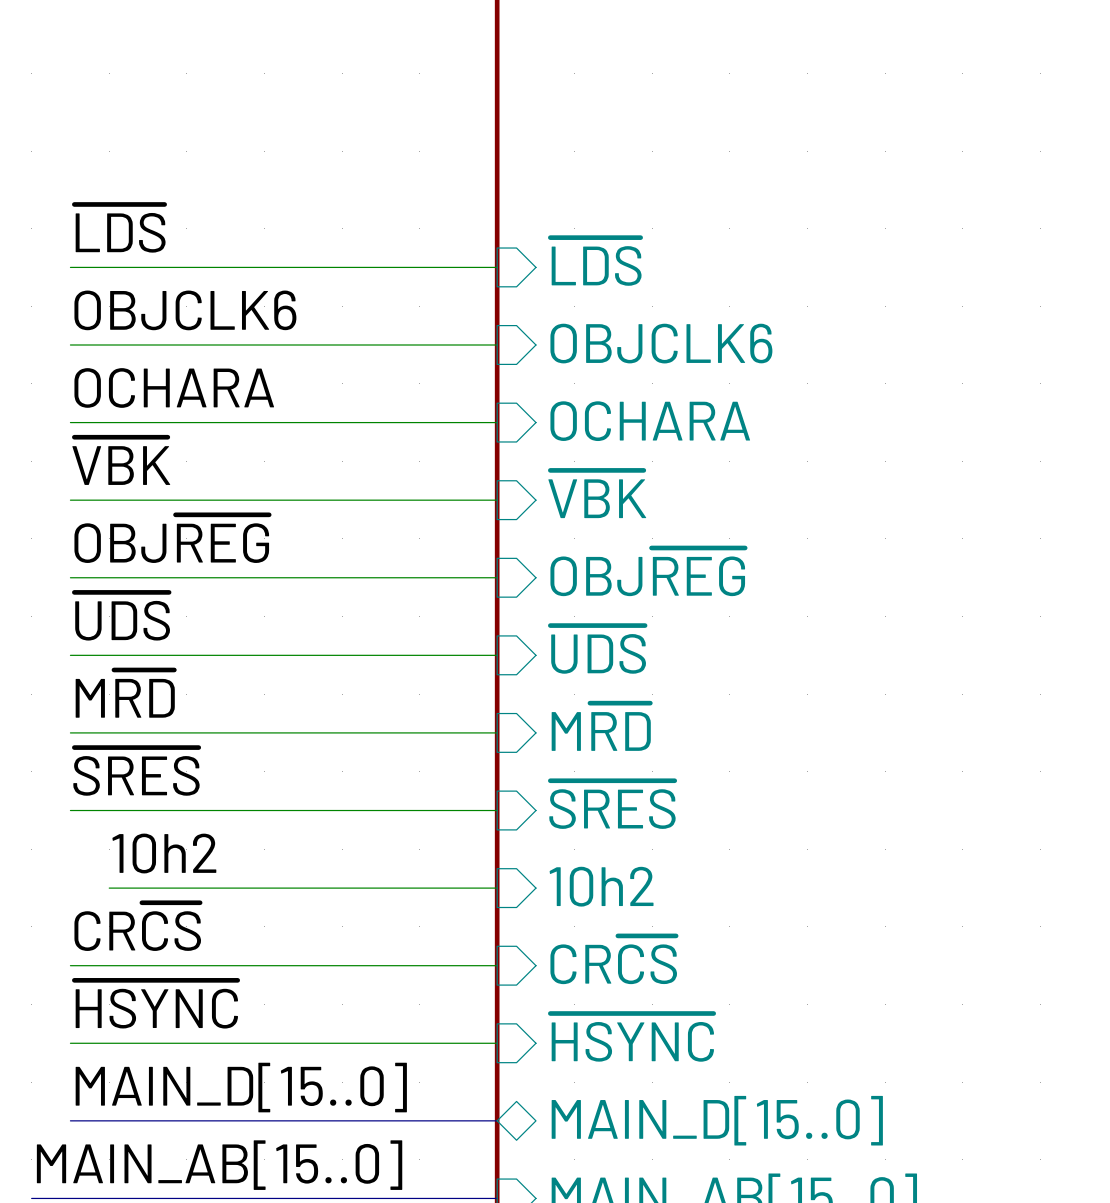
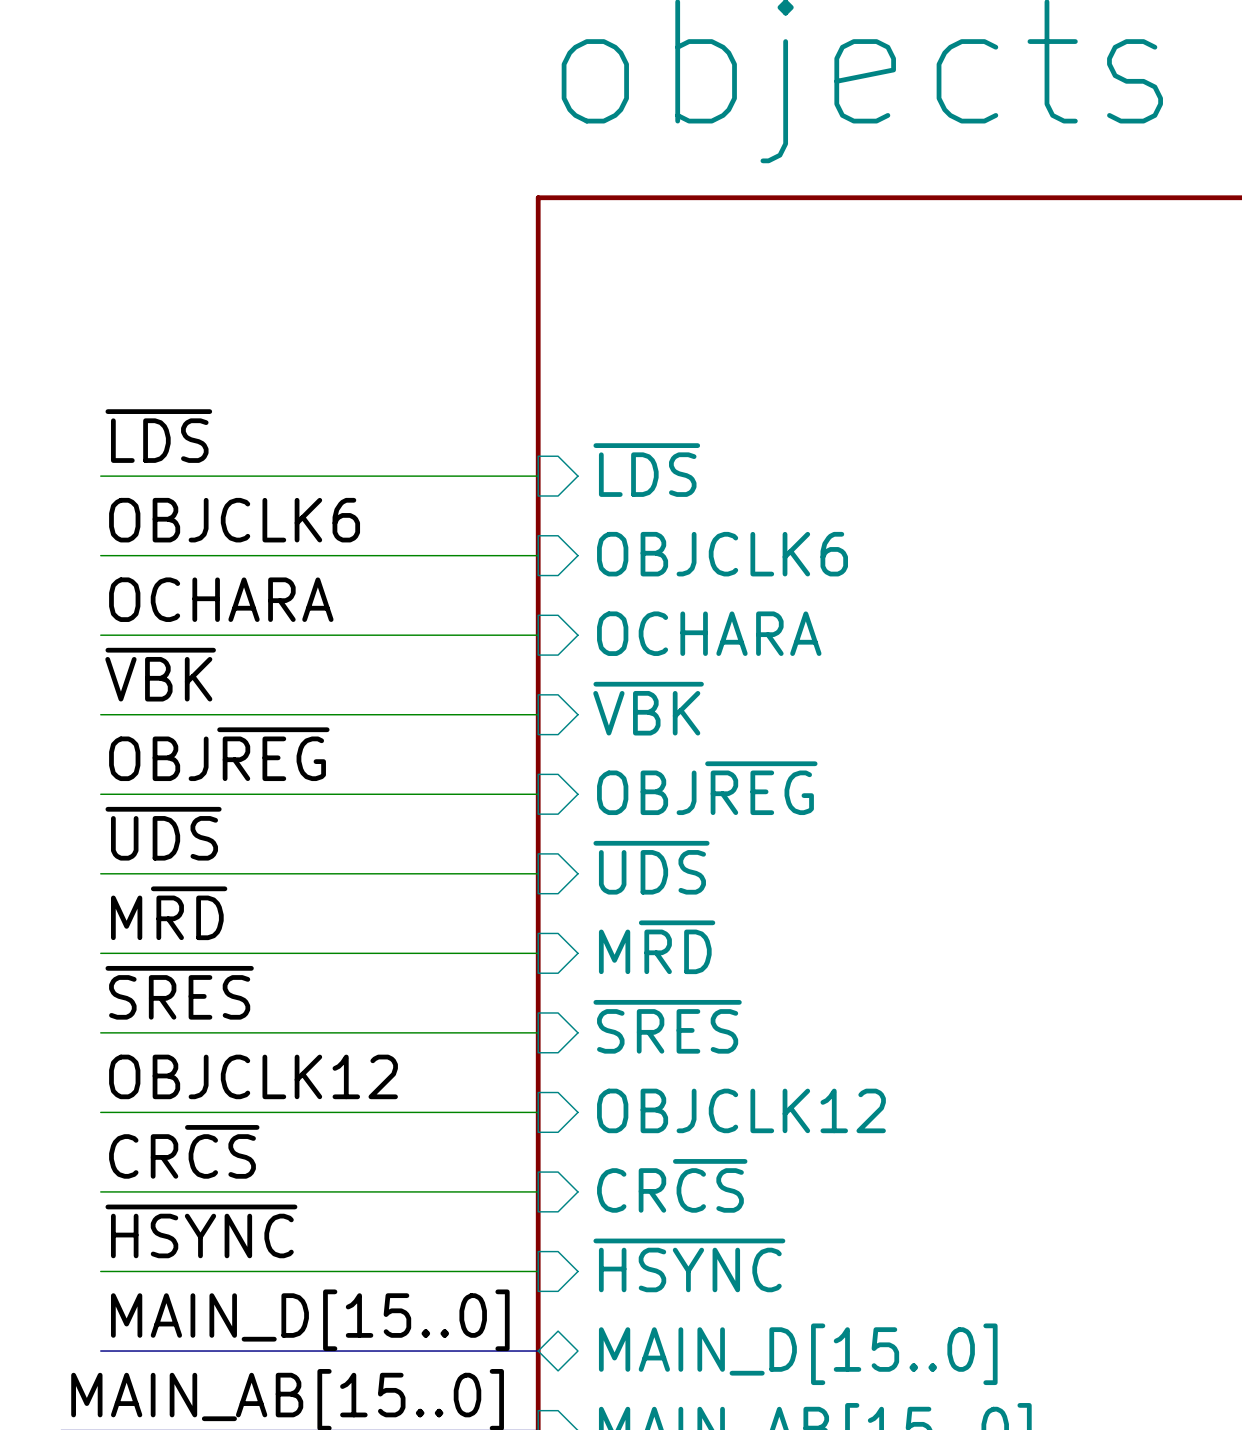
label: 10h2 (164, 853) -> none
label: none -> OBJCLK12 (253, 1076)
sheet pin: 10h2 (601, 886) -> OBJCLK12 (741, 1110)
wire: none -> (100, 1112) (140, 1112)

